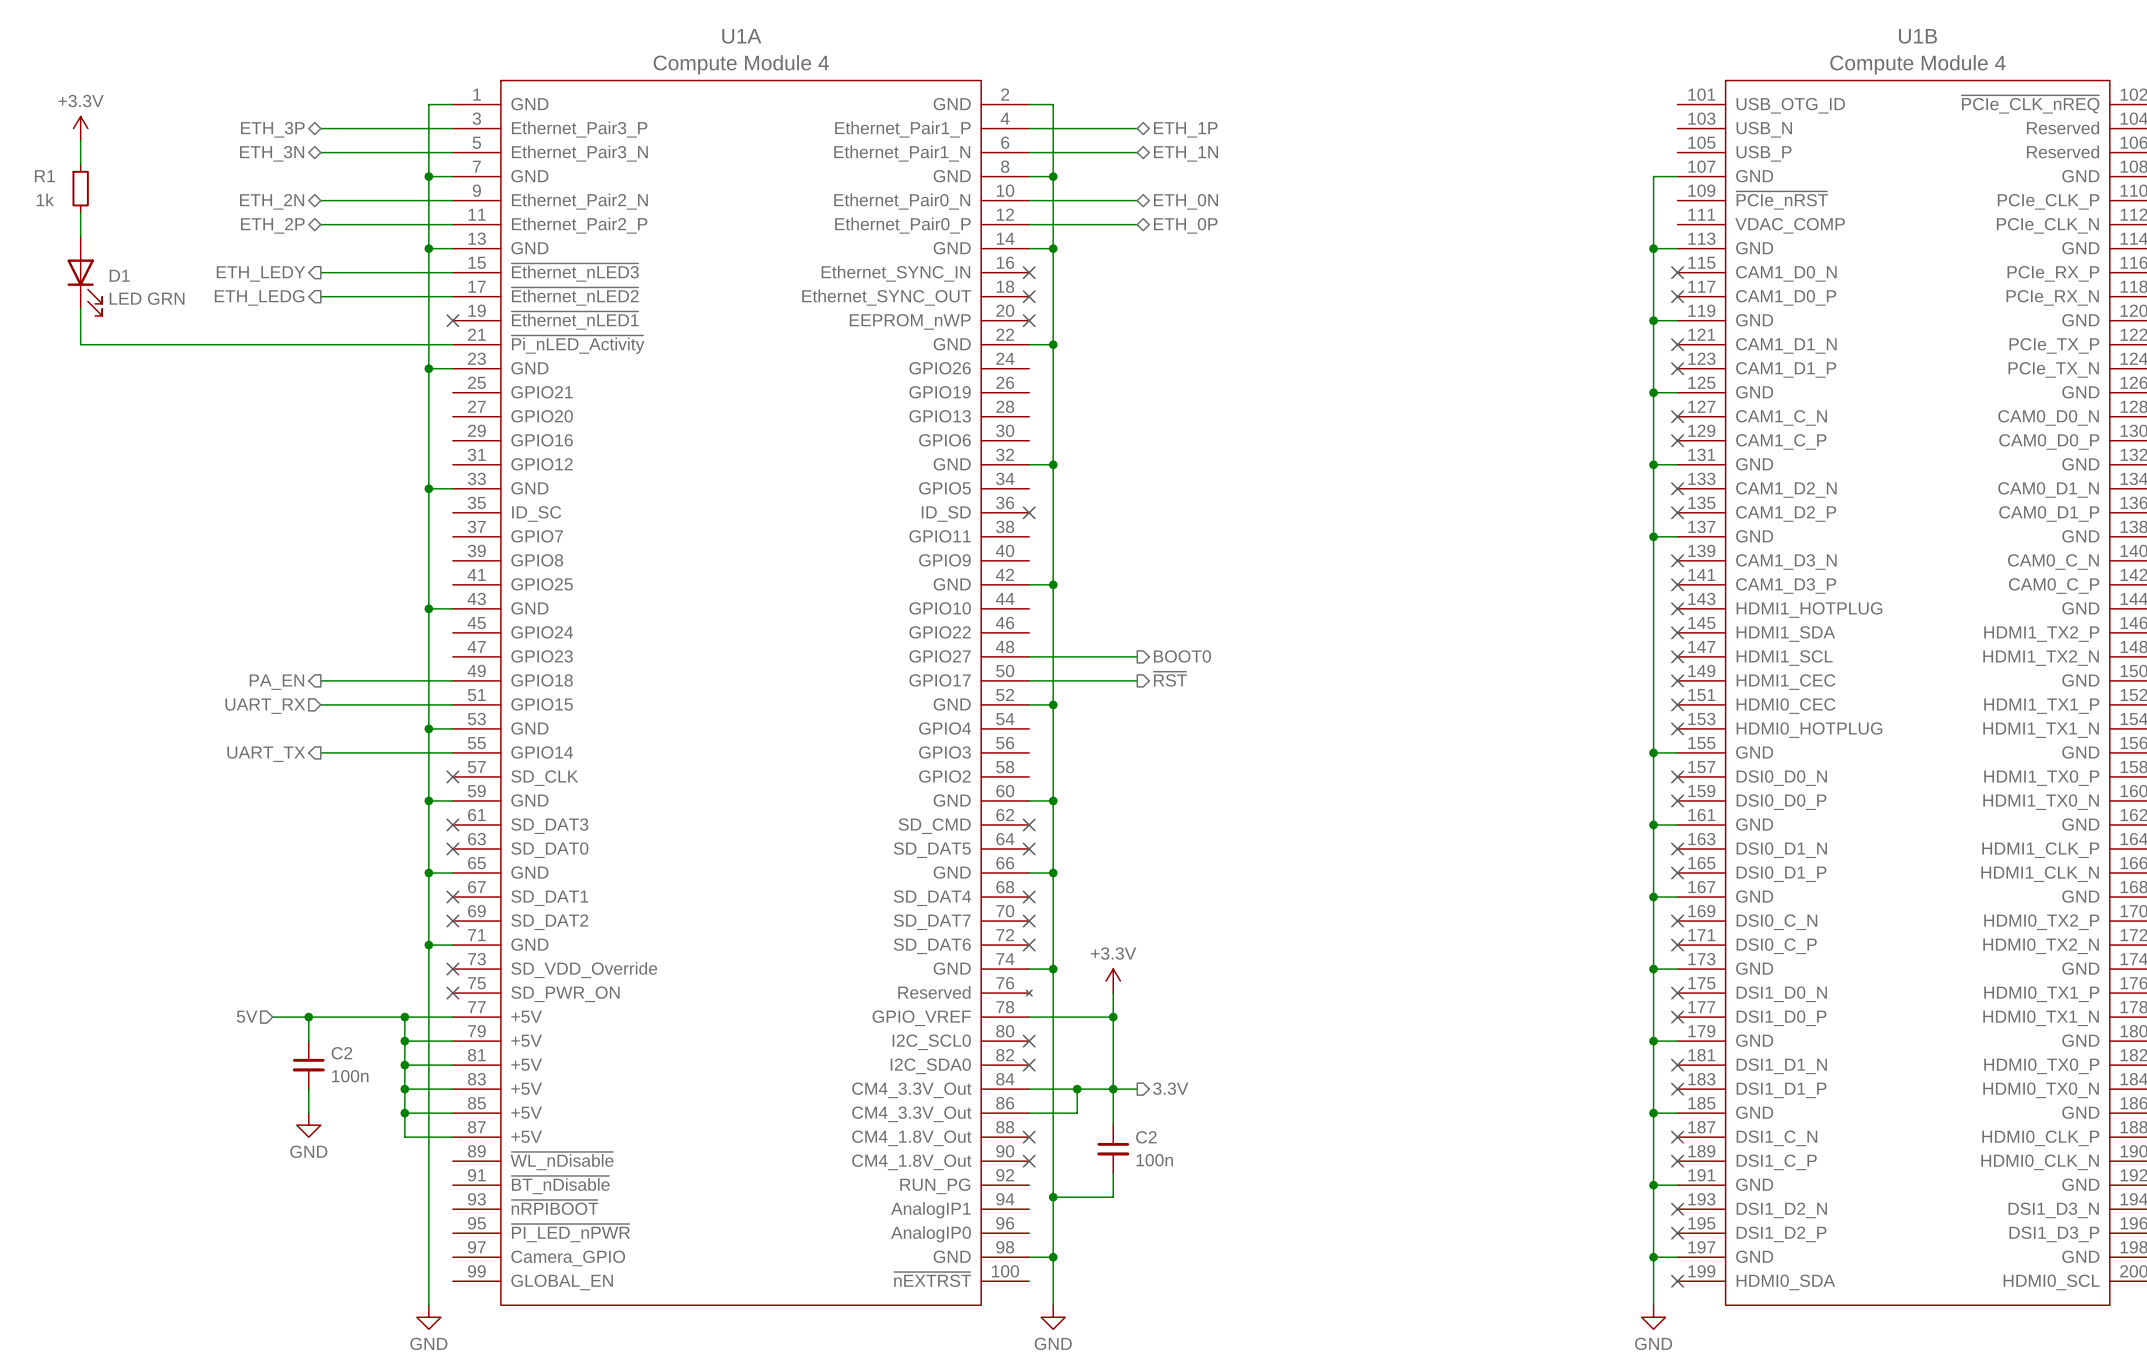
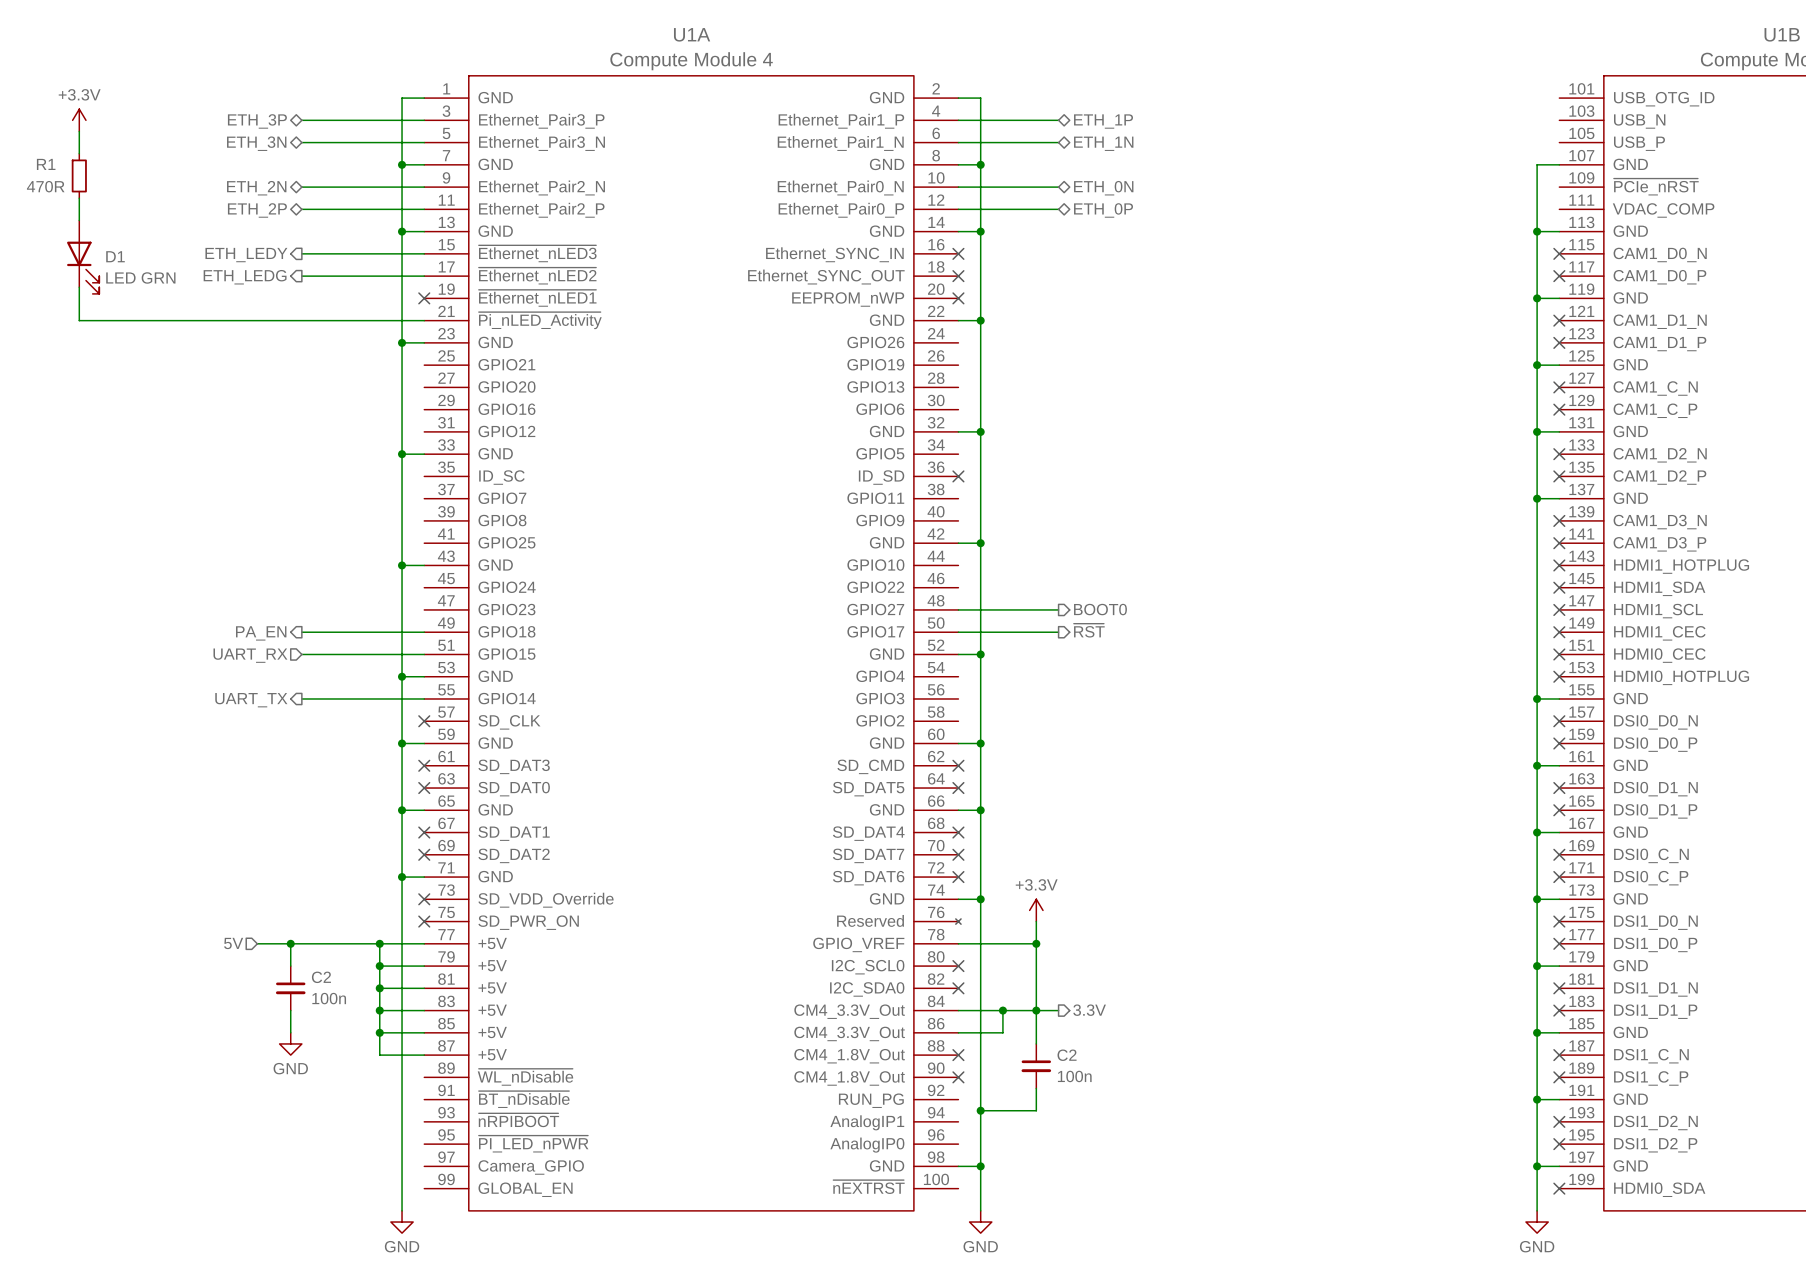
R1 value: 1k (45, 199) -> 470R (45, 186)

